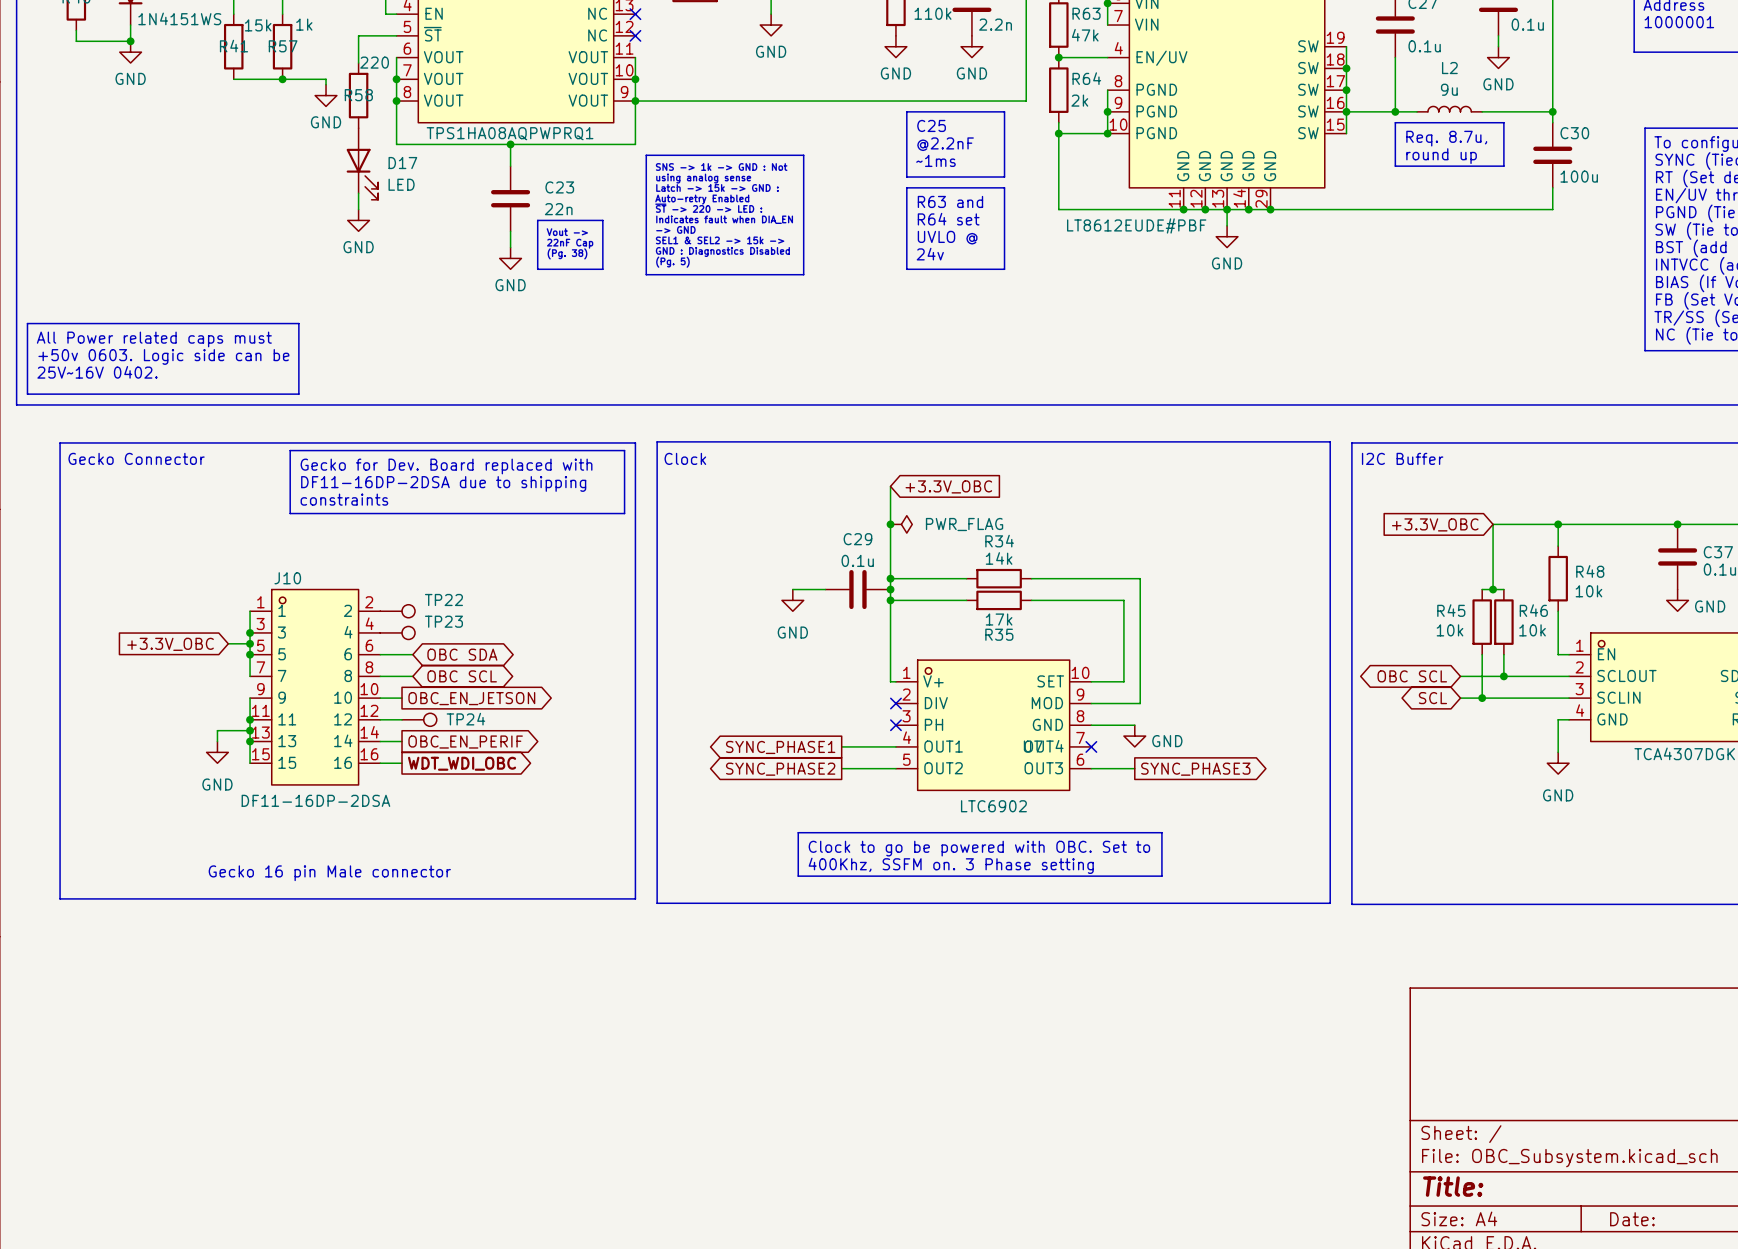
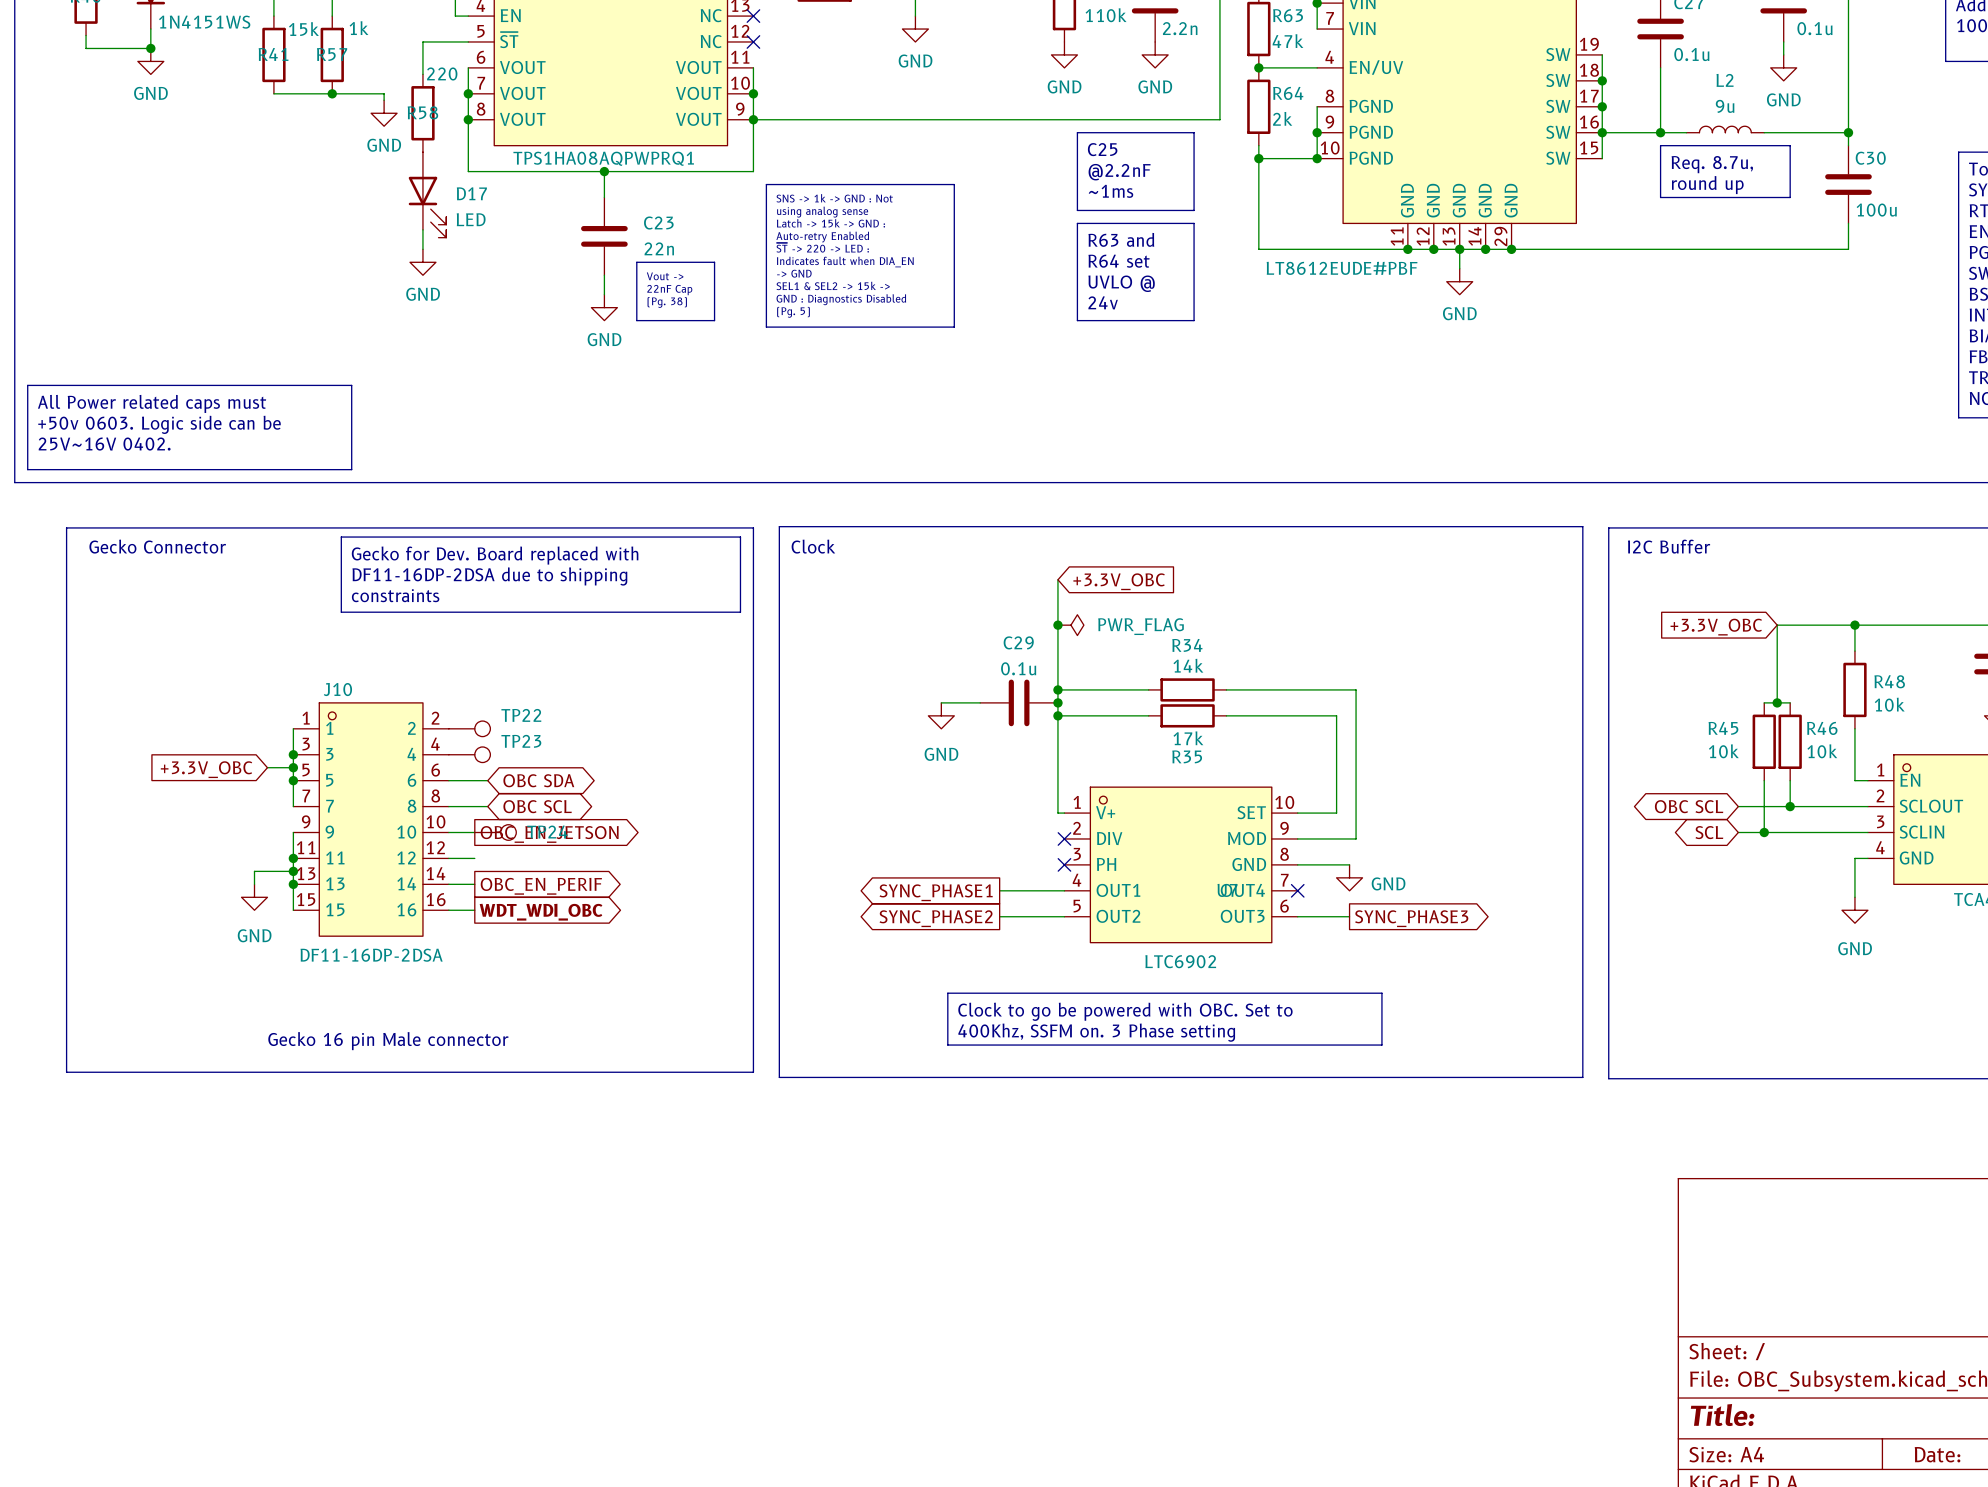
TP24 position: (419, 719) -> (495, 832)

